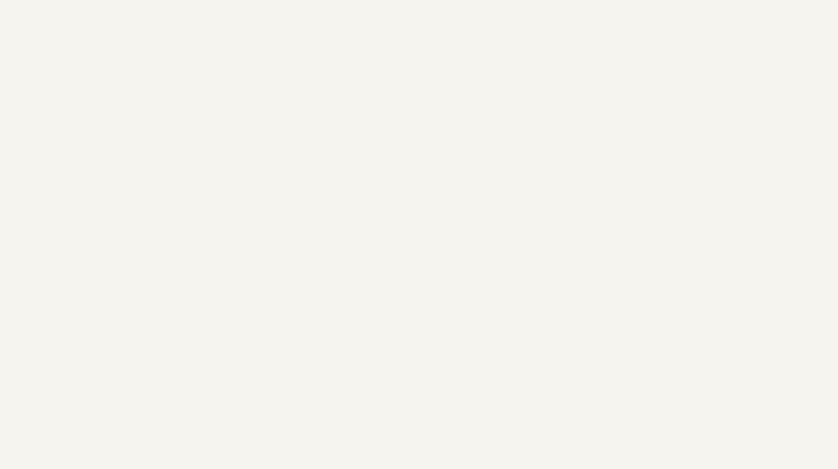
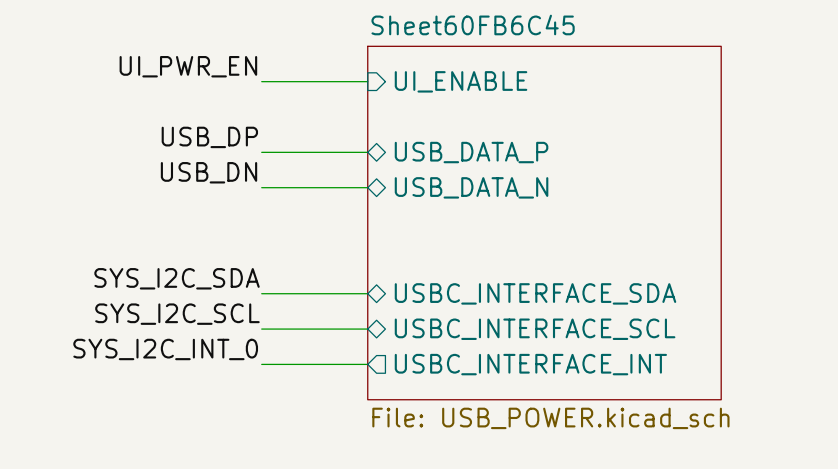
label: none -> UI_PWR_EN (188, 66)
wire: none -> (261, 81) (367, 81)
sheet pin: none -> UI_ENABLE (461, 81)
label: none -> USB_DP (209, 137)
wire: none -> (261, 152) (367, 152)
sheet pin: none -> USB_DATA_P (471, 152)
label: none -> USB_DN (209, 172)
wire: none -> (261, 187) (367, 187)
sheet pin: none -> USB_DATA_N (471, 187)
sheet Sheet60FB6C45: none -> File: USB_POWER.kicad_sch (544, 223)
label: none -> SYS_I2C_SDA (177, 278)
wire: none -> (261, 293) (367, 293)
sheet pin: none -> USBC_INTERFACE_SDA (535, 293)
label: none -> SYS_I2C_SCL (177, 314)
wire: none -> (261, 329) (367, 329)
sheet pin: none -> USBC_INTERFACE_SCL (535, 329)
label: none -> SYS_I2C_INT_0 (165, 349)
wire: none -> (261, 364) (367, 364)
sheet pin: none -> USBC_INTERFACE_INT (530, 364)

